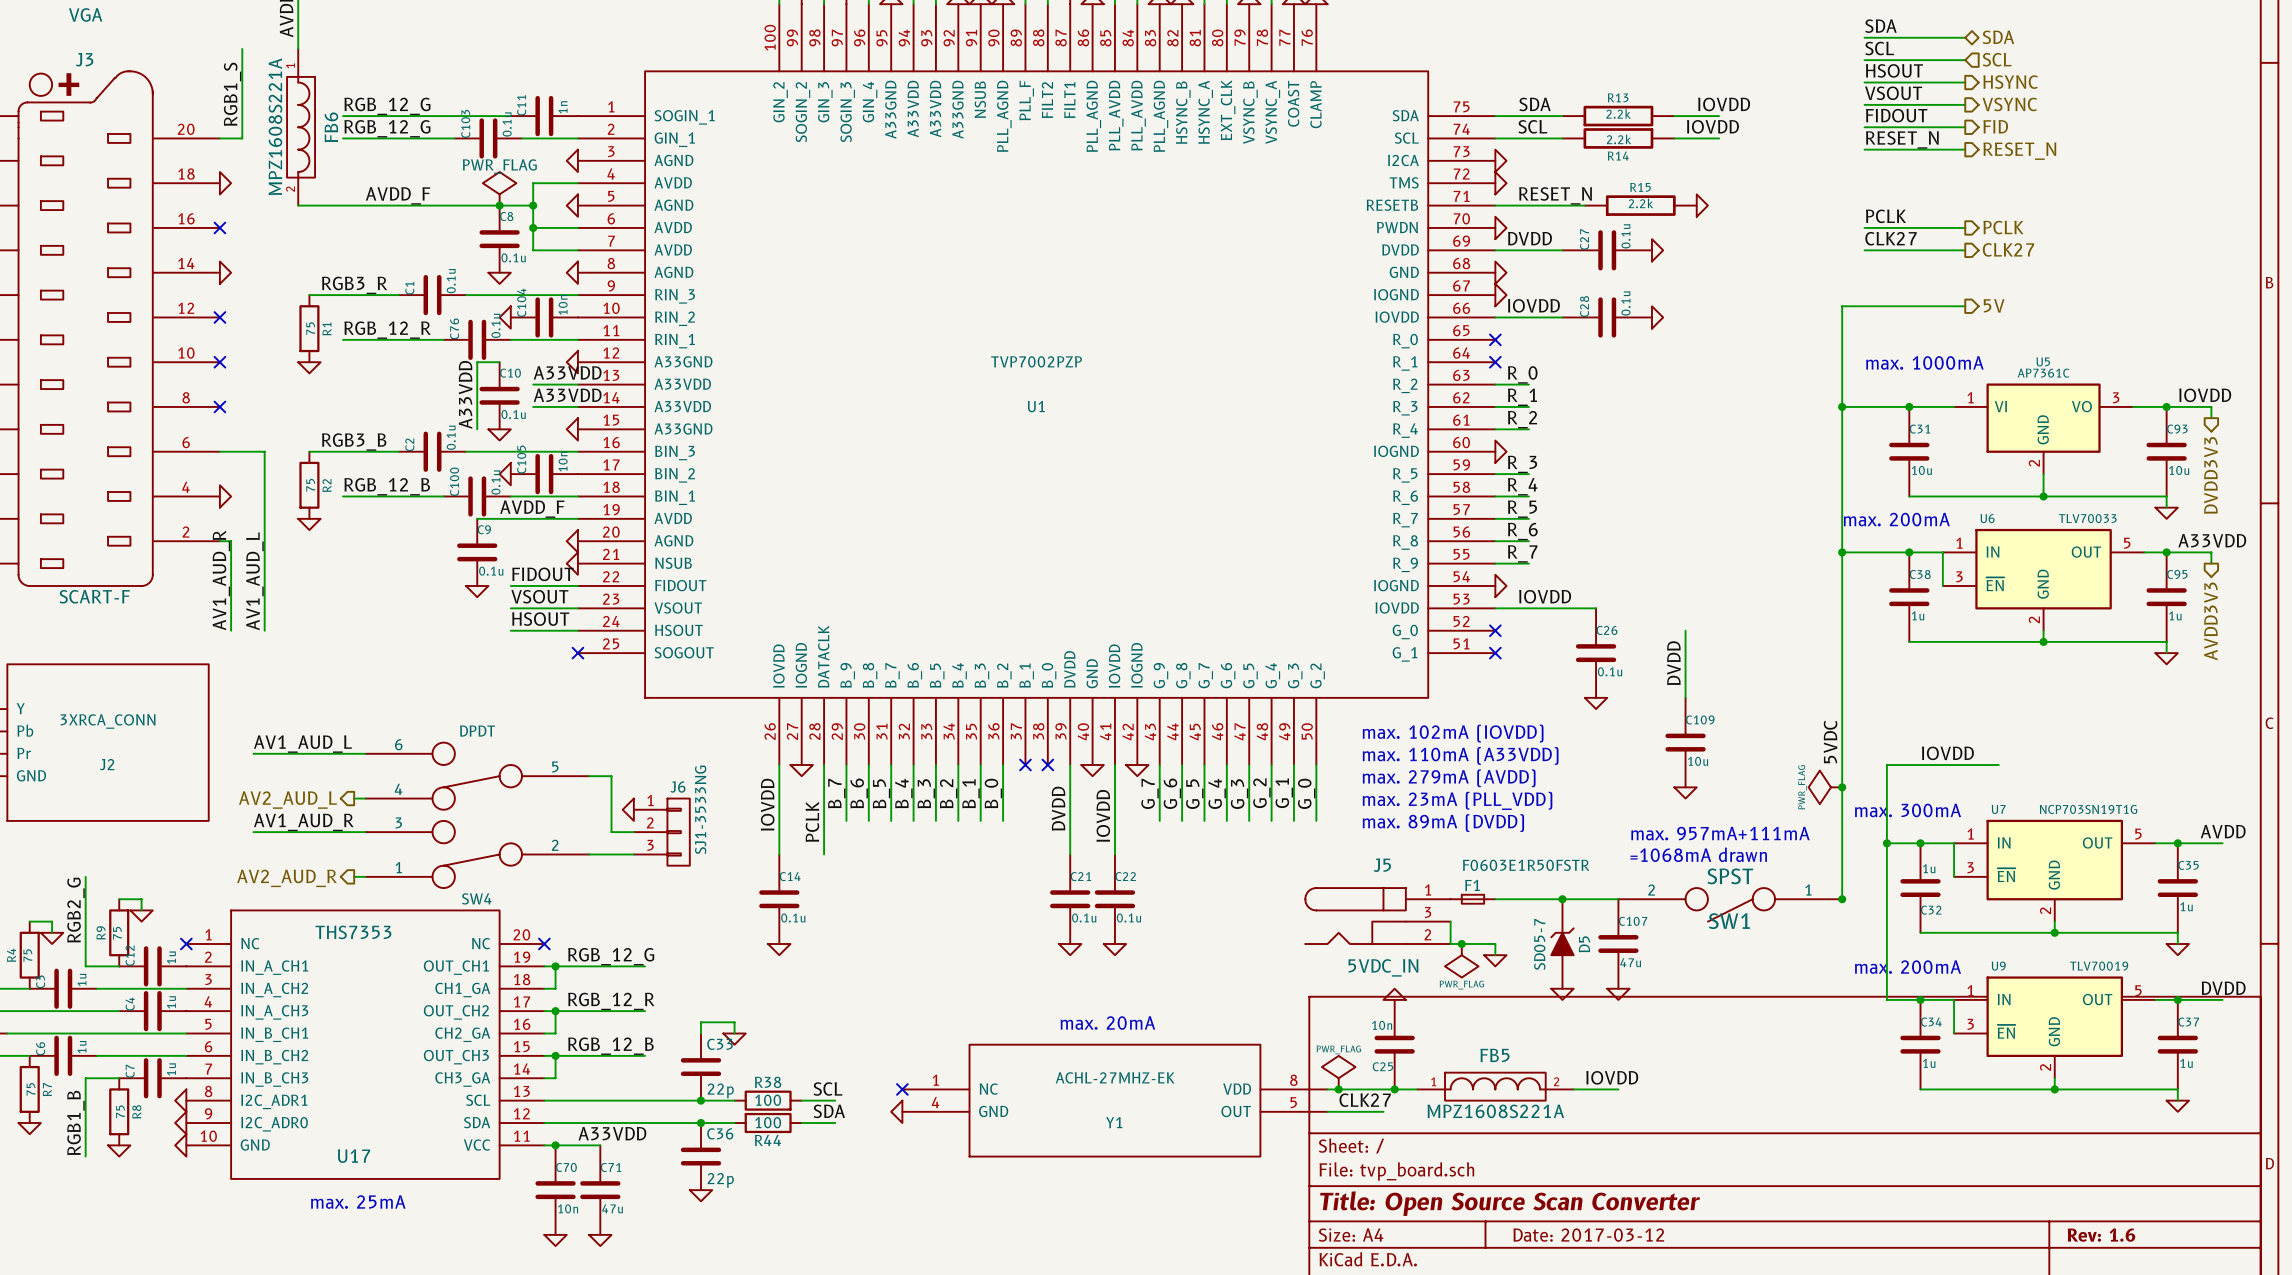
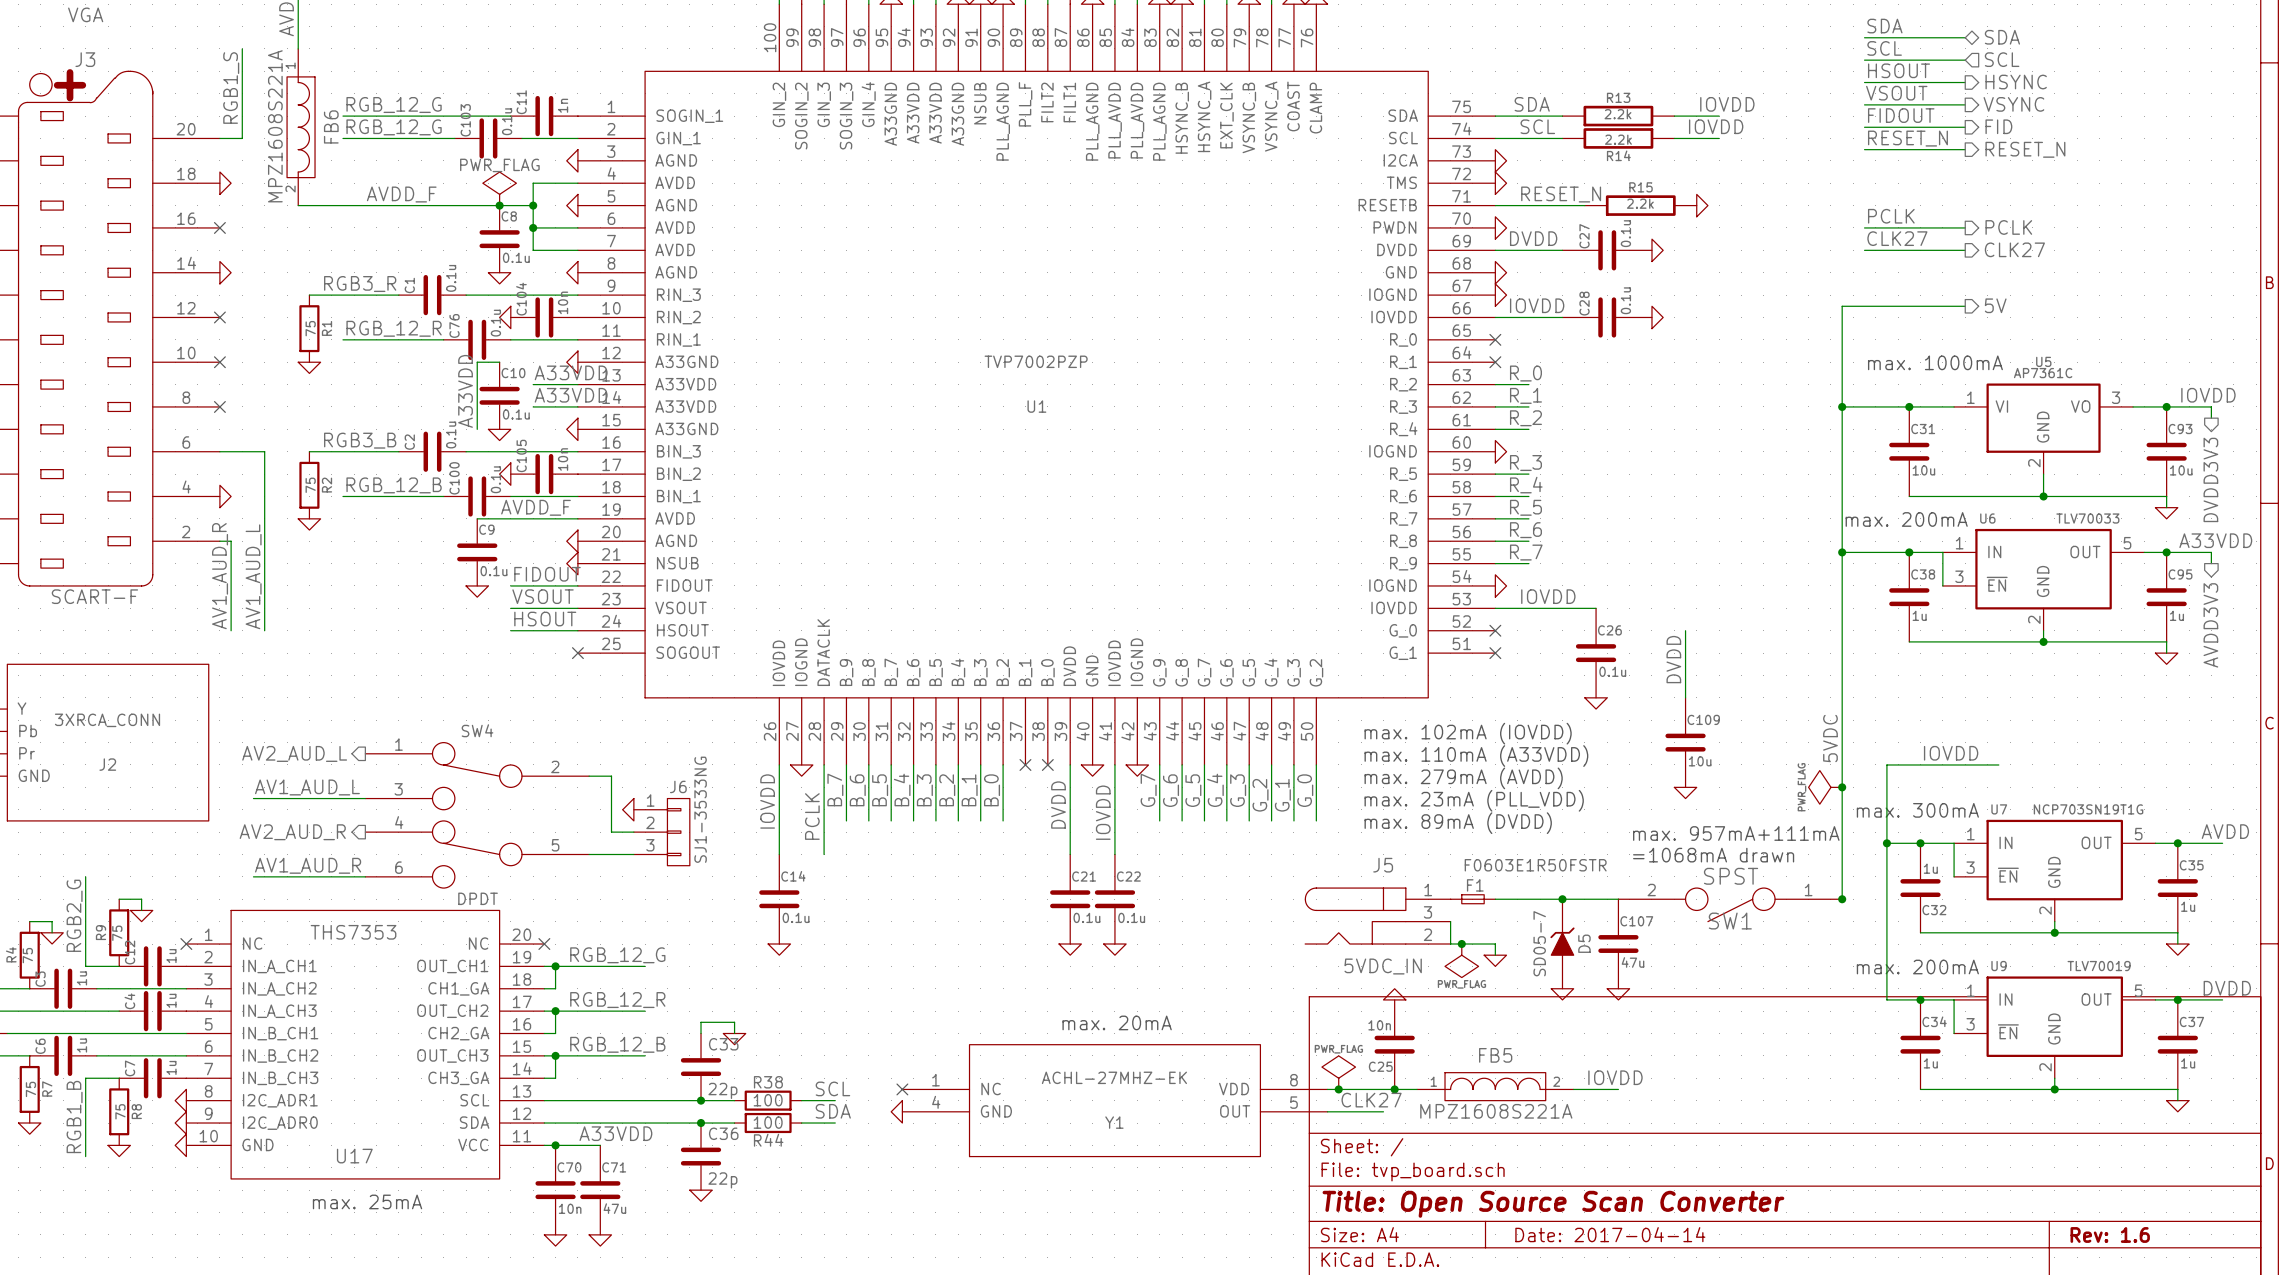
label position: AV1_AUD_L (302, 744) -> AV1_AUD_L (307, 787)
wire: (253, 753) (365, 753) -> none
wire: none -> (253, 798) (354, 798)
hierarchical label position: AV2_AUD_L (287, 800) -> AV2_AUD_L (294, 753)
SW4 flip: as is (477, 815) -> up-down (477, 815)
label position: AV1_AUD_R (303, 822) -> AV1_AUD_R (308, 865)
wire: (253, 832) (365, 832) -> none
wire: none -> (253, 876) (354, 876)
hierarchical label position: AV2_AUD_R (287, 878) -> AV2_AUD_R (292, 832)
title block: Date: 2017-03-12 (1588, 1235) -> Date: 2017-04-14 (1610, 1234)

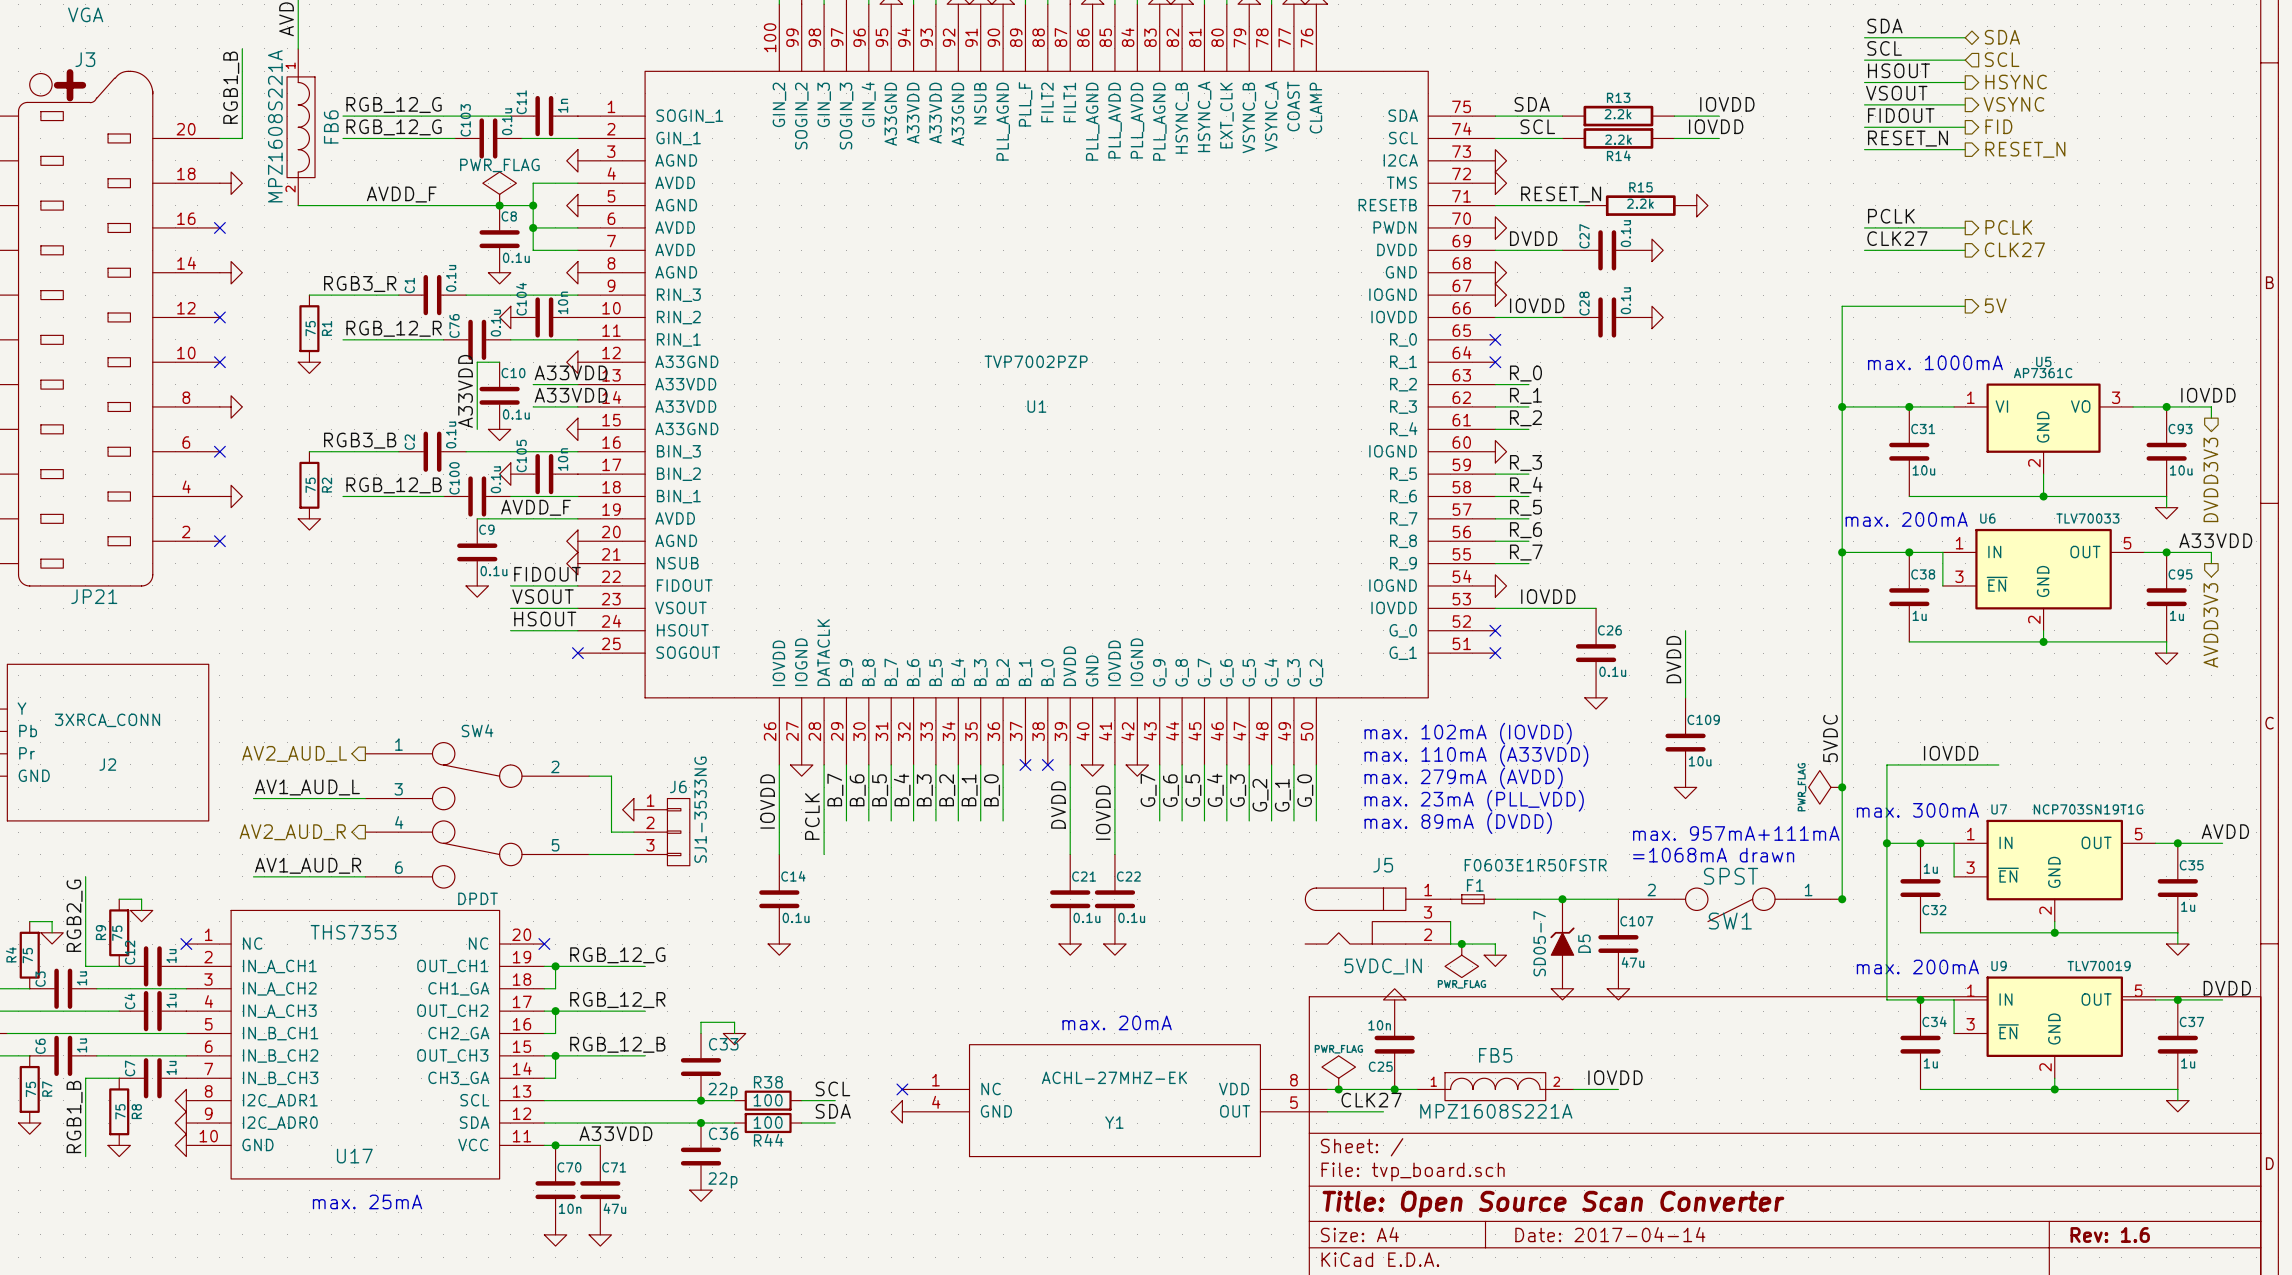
label: RGB1_S (231, 88) -> RGB1_B (231, 87)
power symbol shape: [219, 172, 232, 195] -> [219, 172, 243, 195]
power symbol shape: [219, 261, 232, 284] -> [219, 261, 243, 284]
no-connect mark position: (219, 406) -> (219, 451)
power symbol: none -> (231, 406)
wire: (219, 451) (264, 451) (264, 630) -> none
power symbol shape: [219, 485, 232, 508] -> [219, 485, 243, 508]
wire: (219, 541) (231, 541) (231, 630) -> none
no-connect mark: none -> (219, 541)
label: AV1_AUD_R (220, 576) -> none
label: AV1_AUD_L (253, 576) -> none
J3 value: SCART-F (94, 596) -> JP21 (94, 596)

